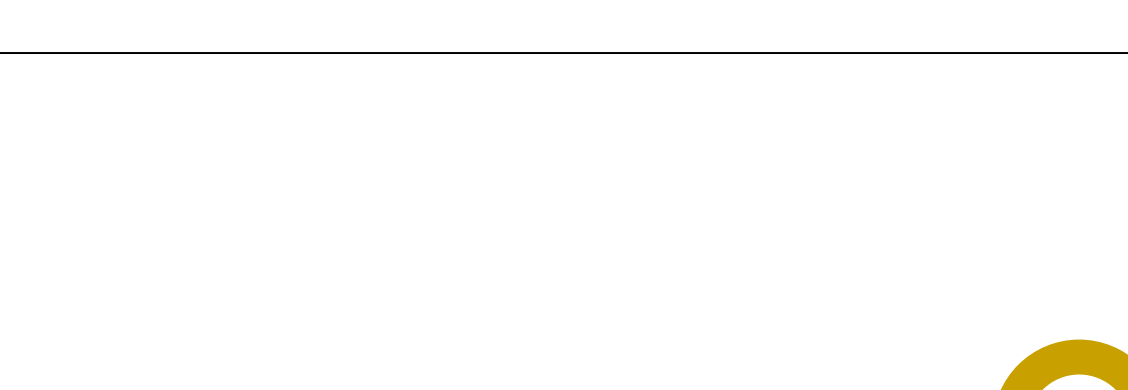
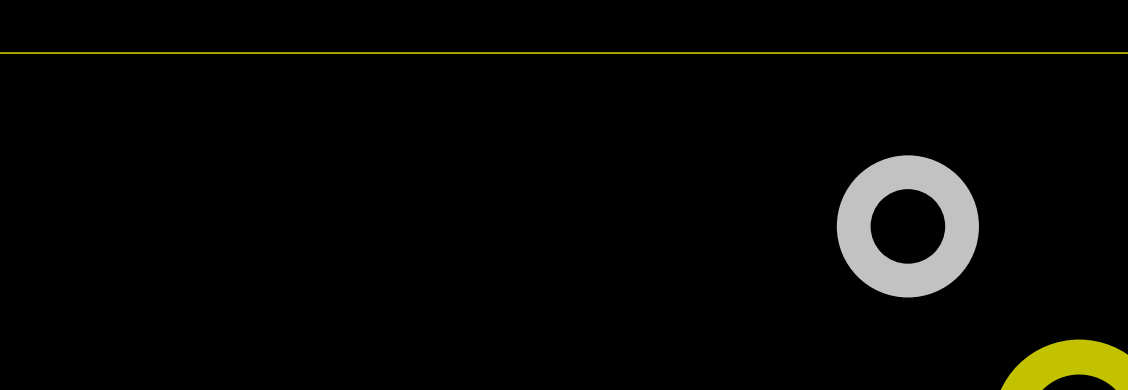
via: none -> (907, 226)

